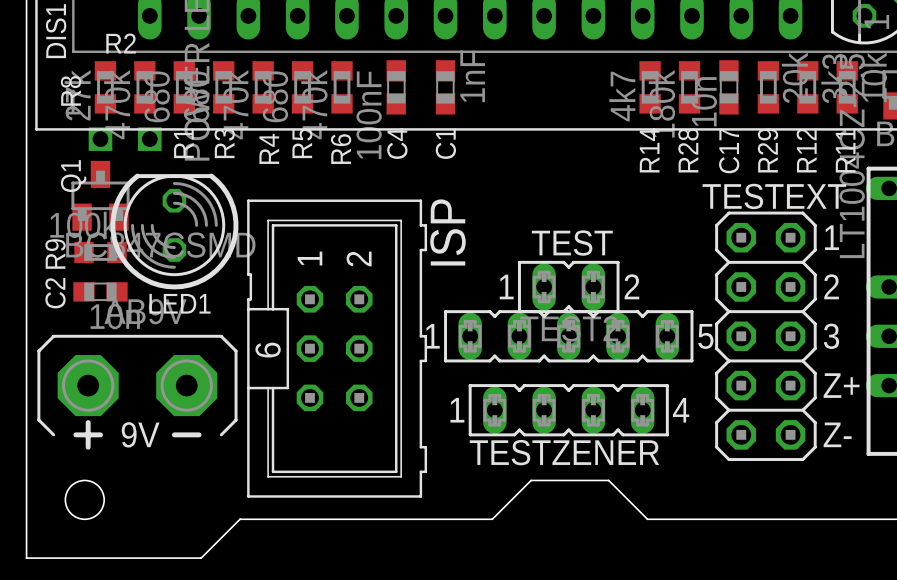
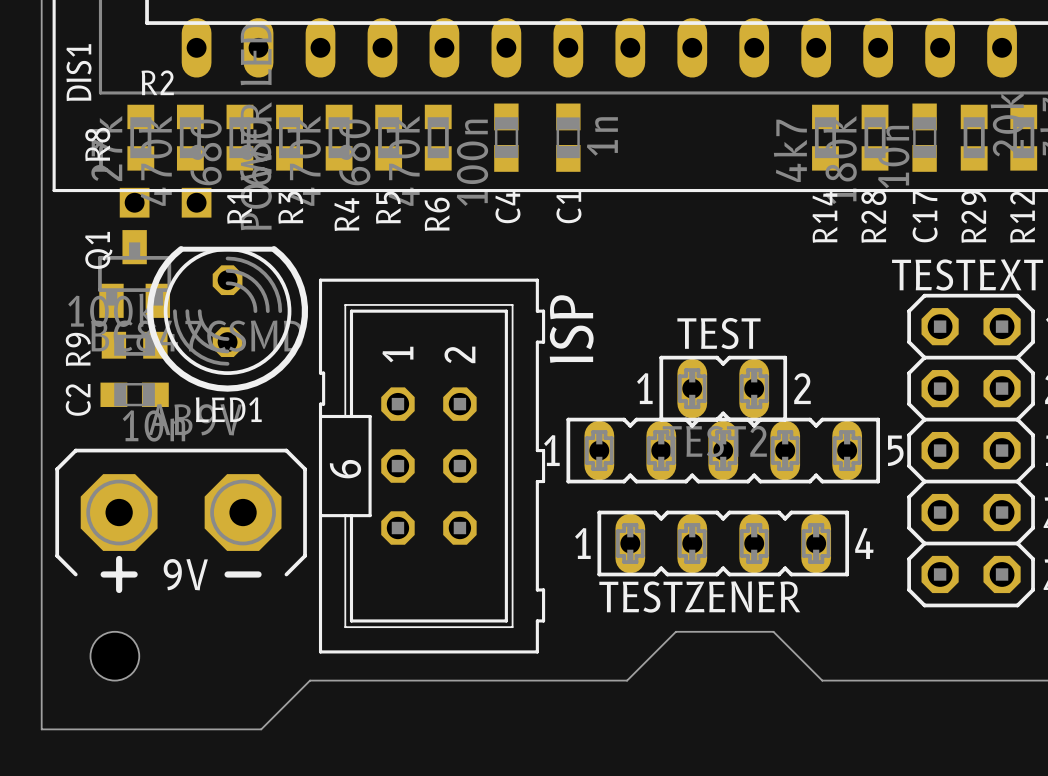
C1 value: 1nF (472, 76) -> 1n (602, 136)
C4 value: 100nF (369, 115) -> 100n (472, 162)

